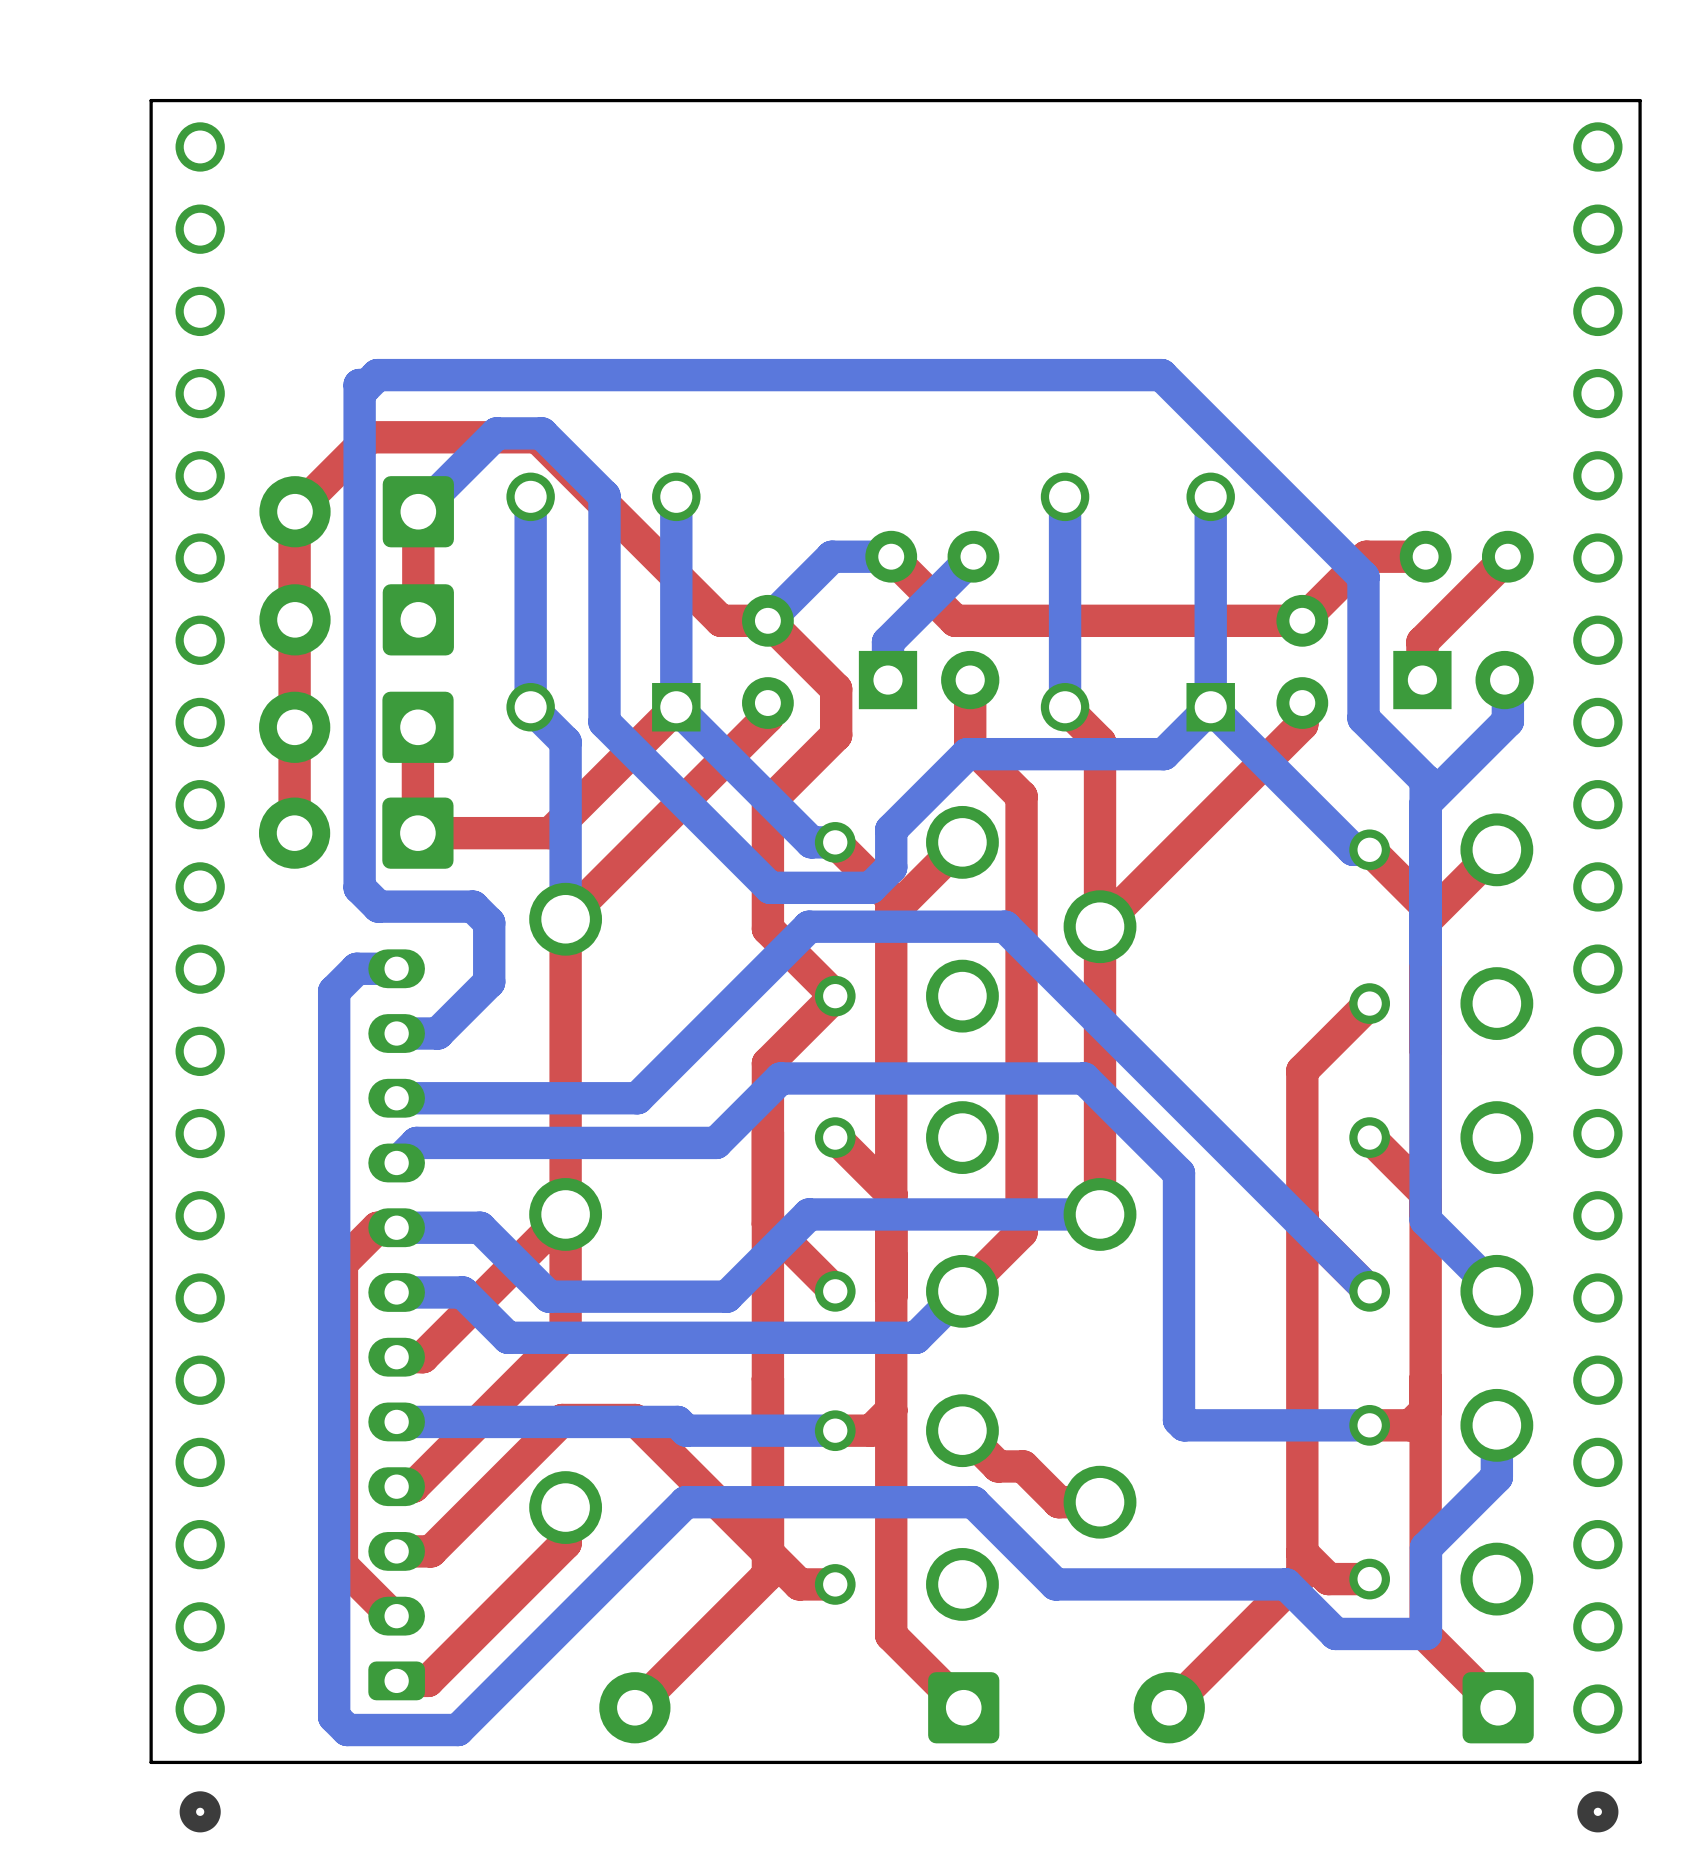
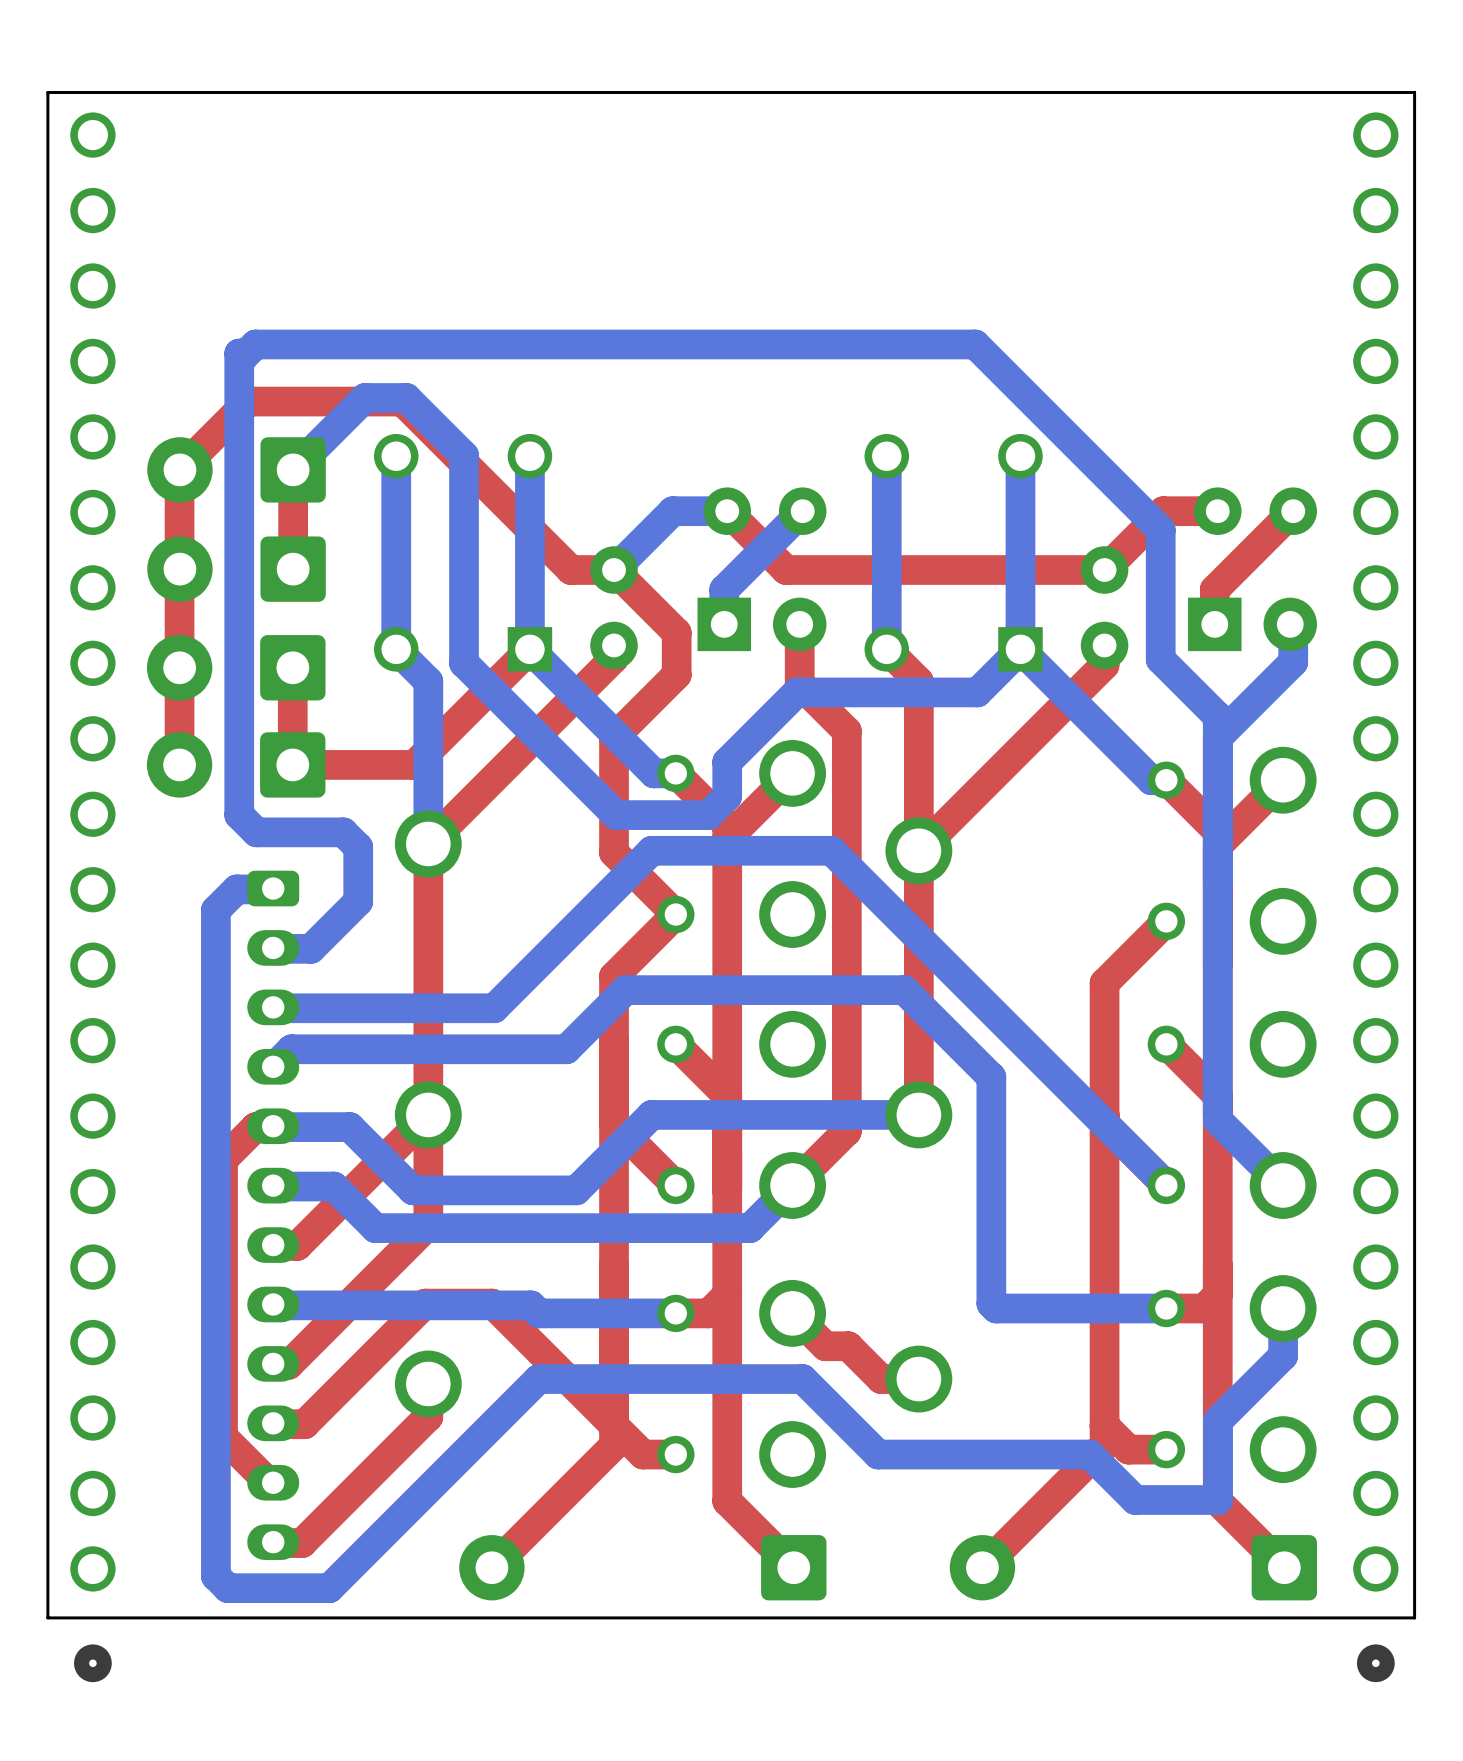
part rotation: 0° (396, 1324) -> 180° (273, 1215)

